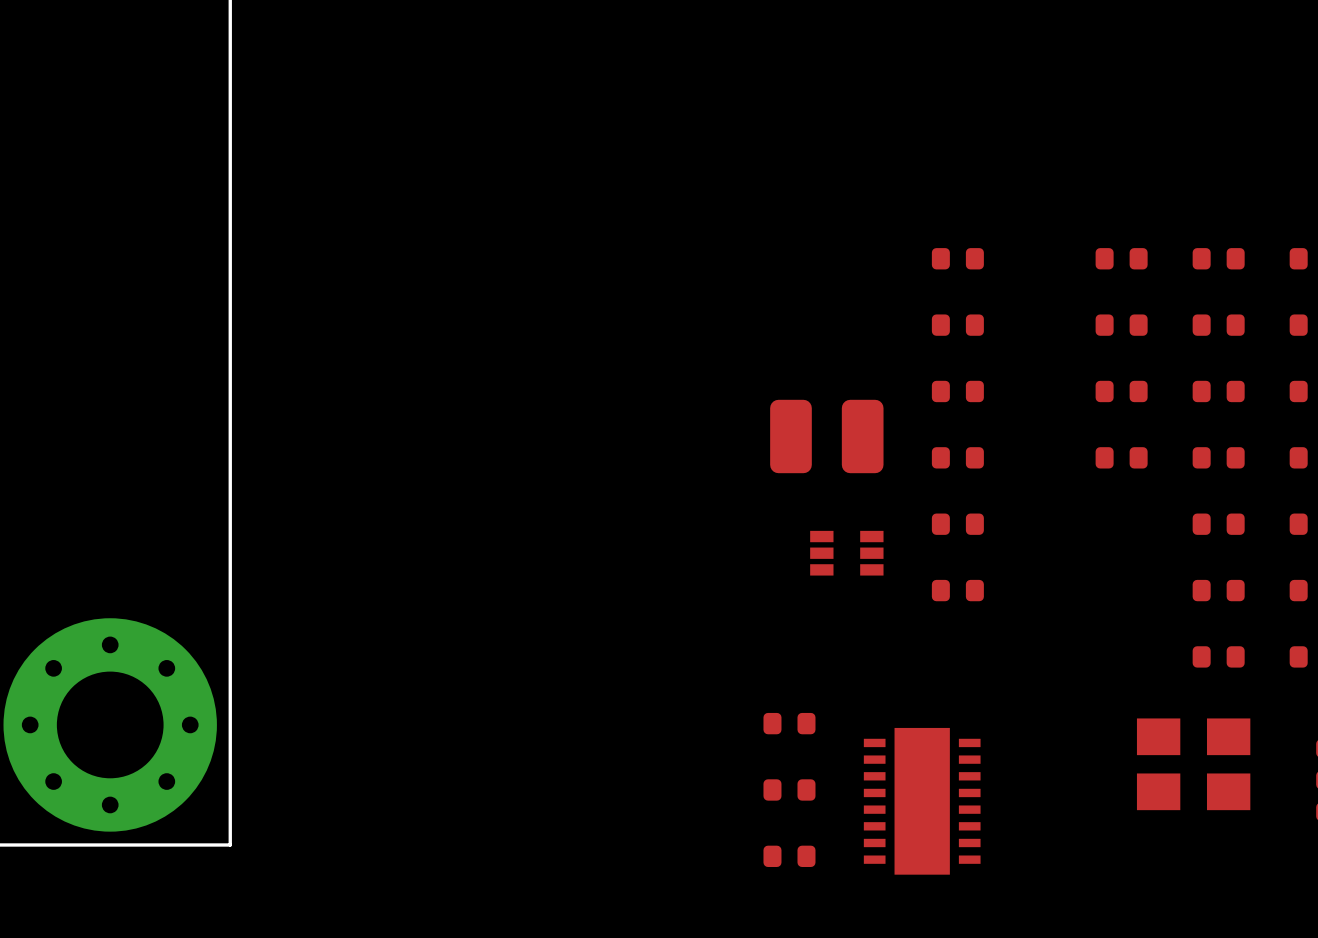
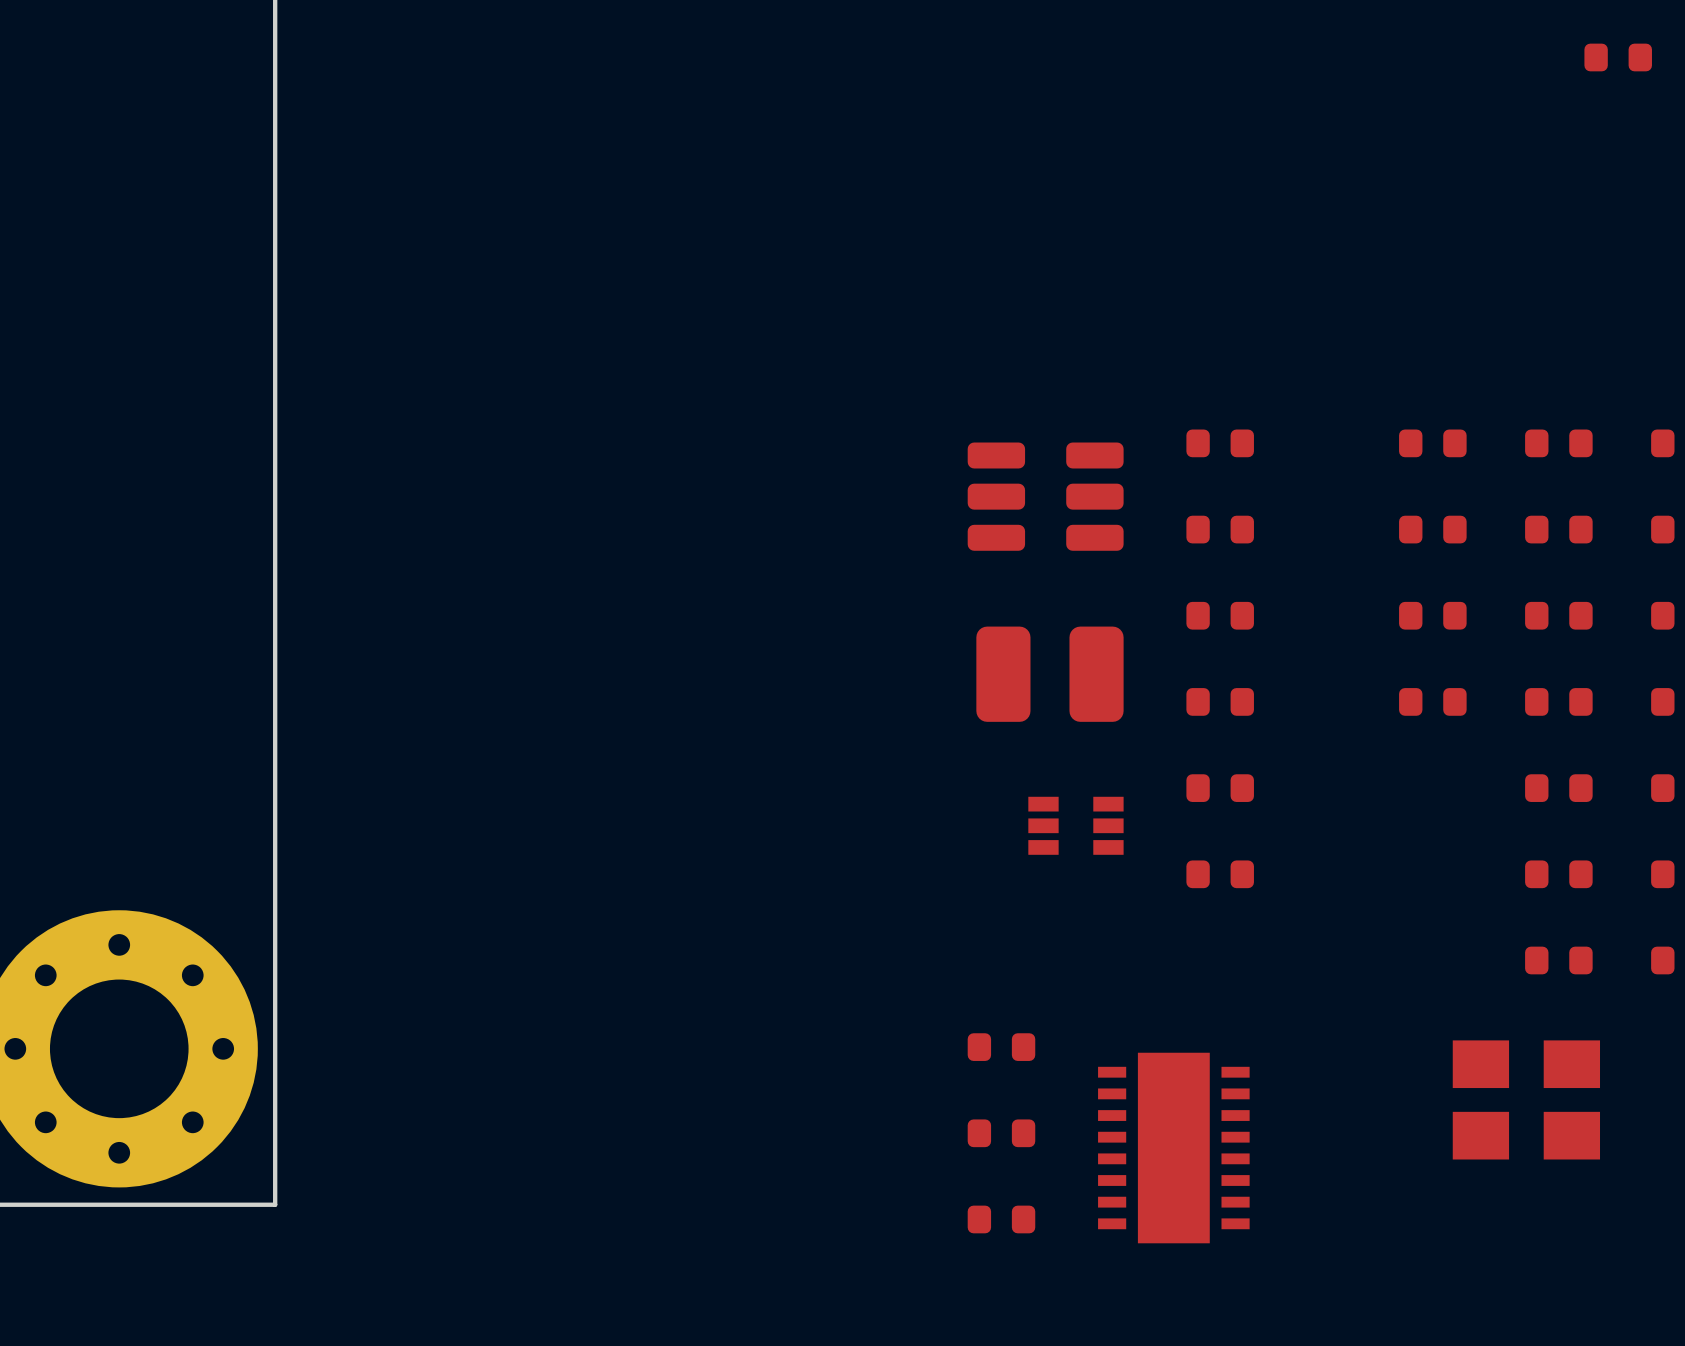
part: none -> (1045, 496)

